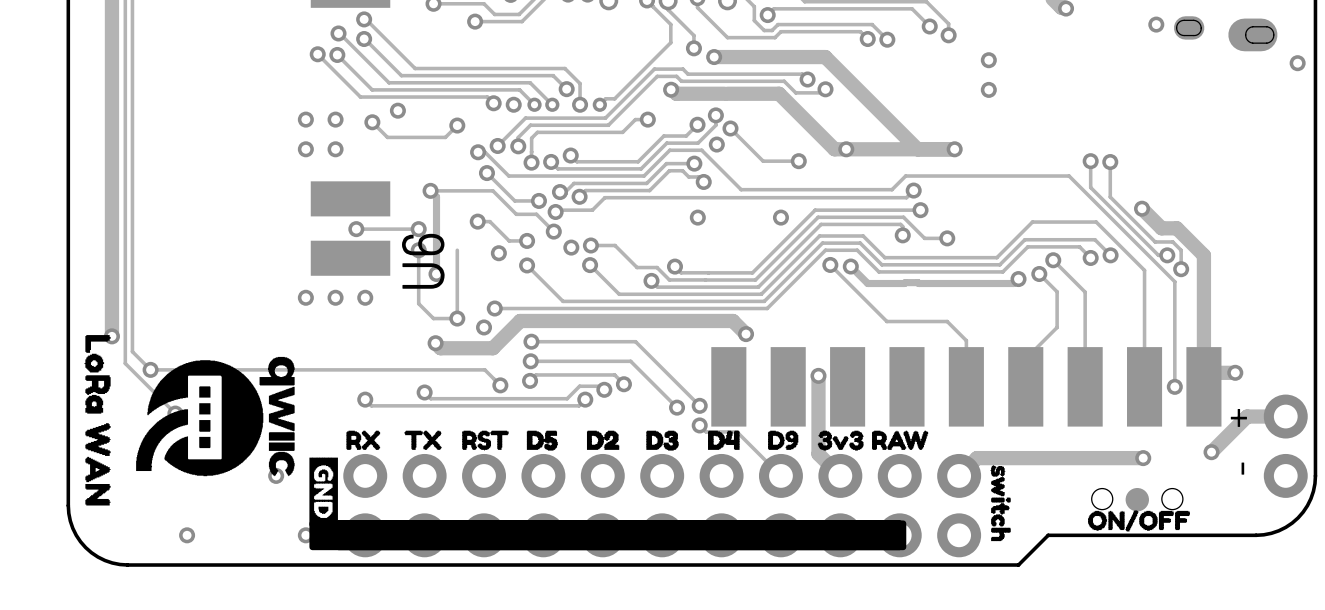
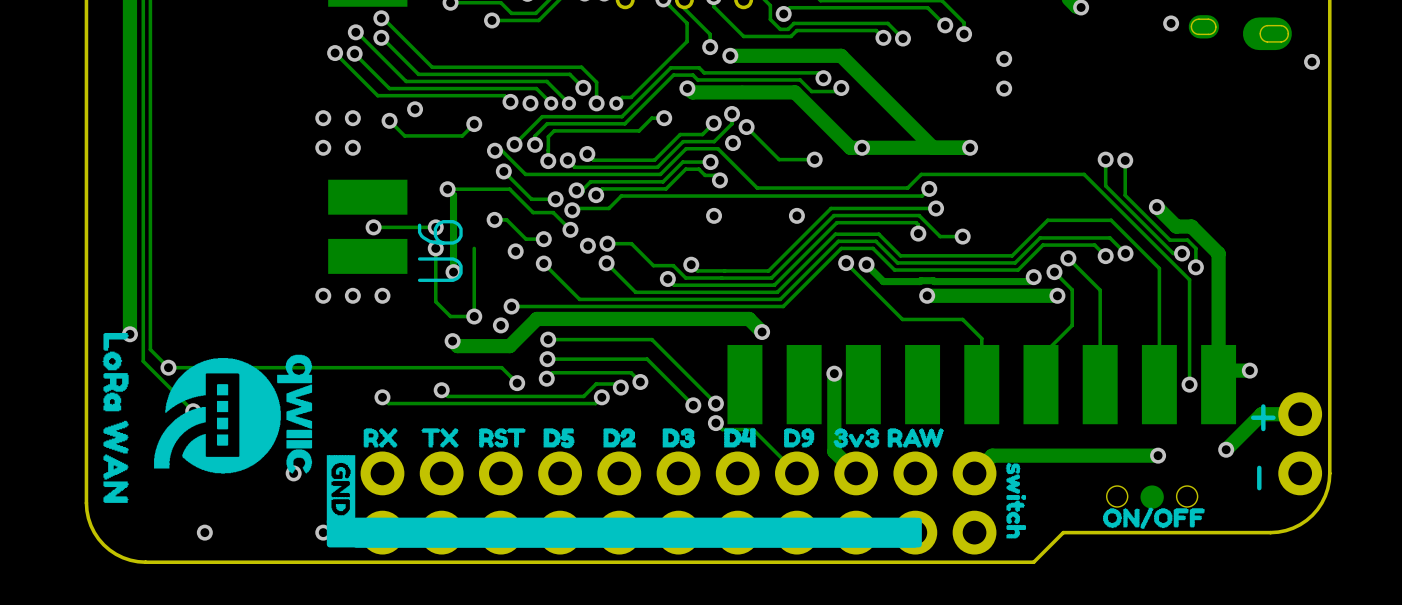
via: none -> (927, 295)
track: none -> (1057, 295) (927, 295)
via: none -> (1057, 295)

